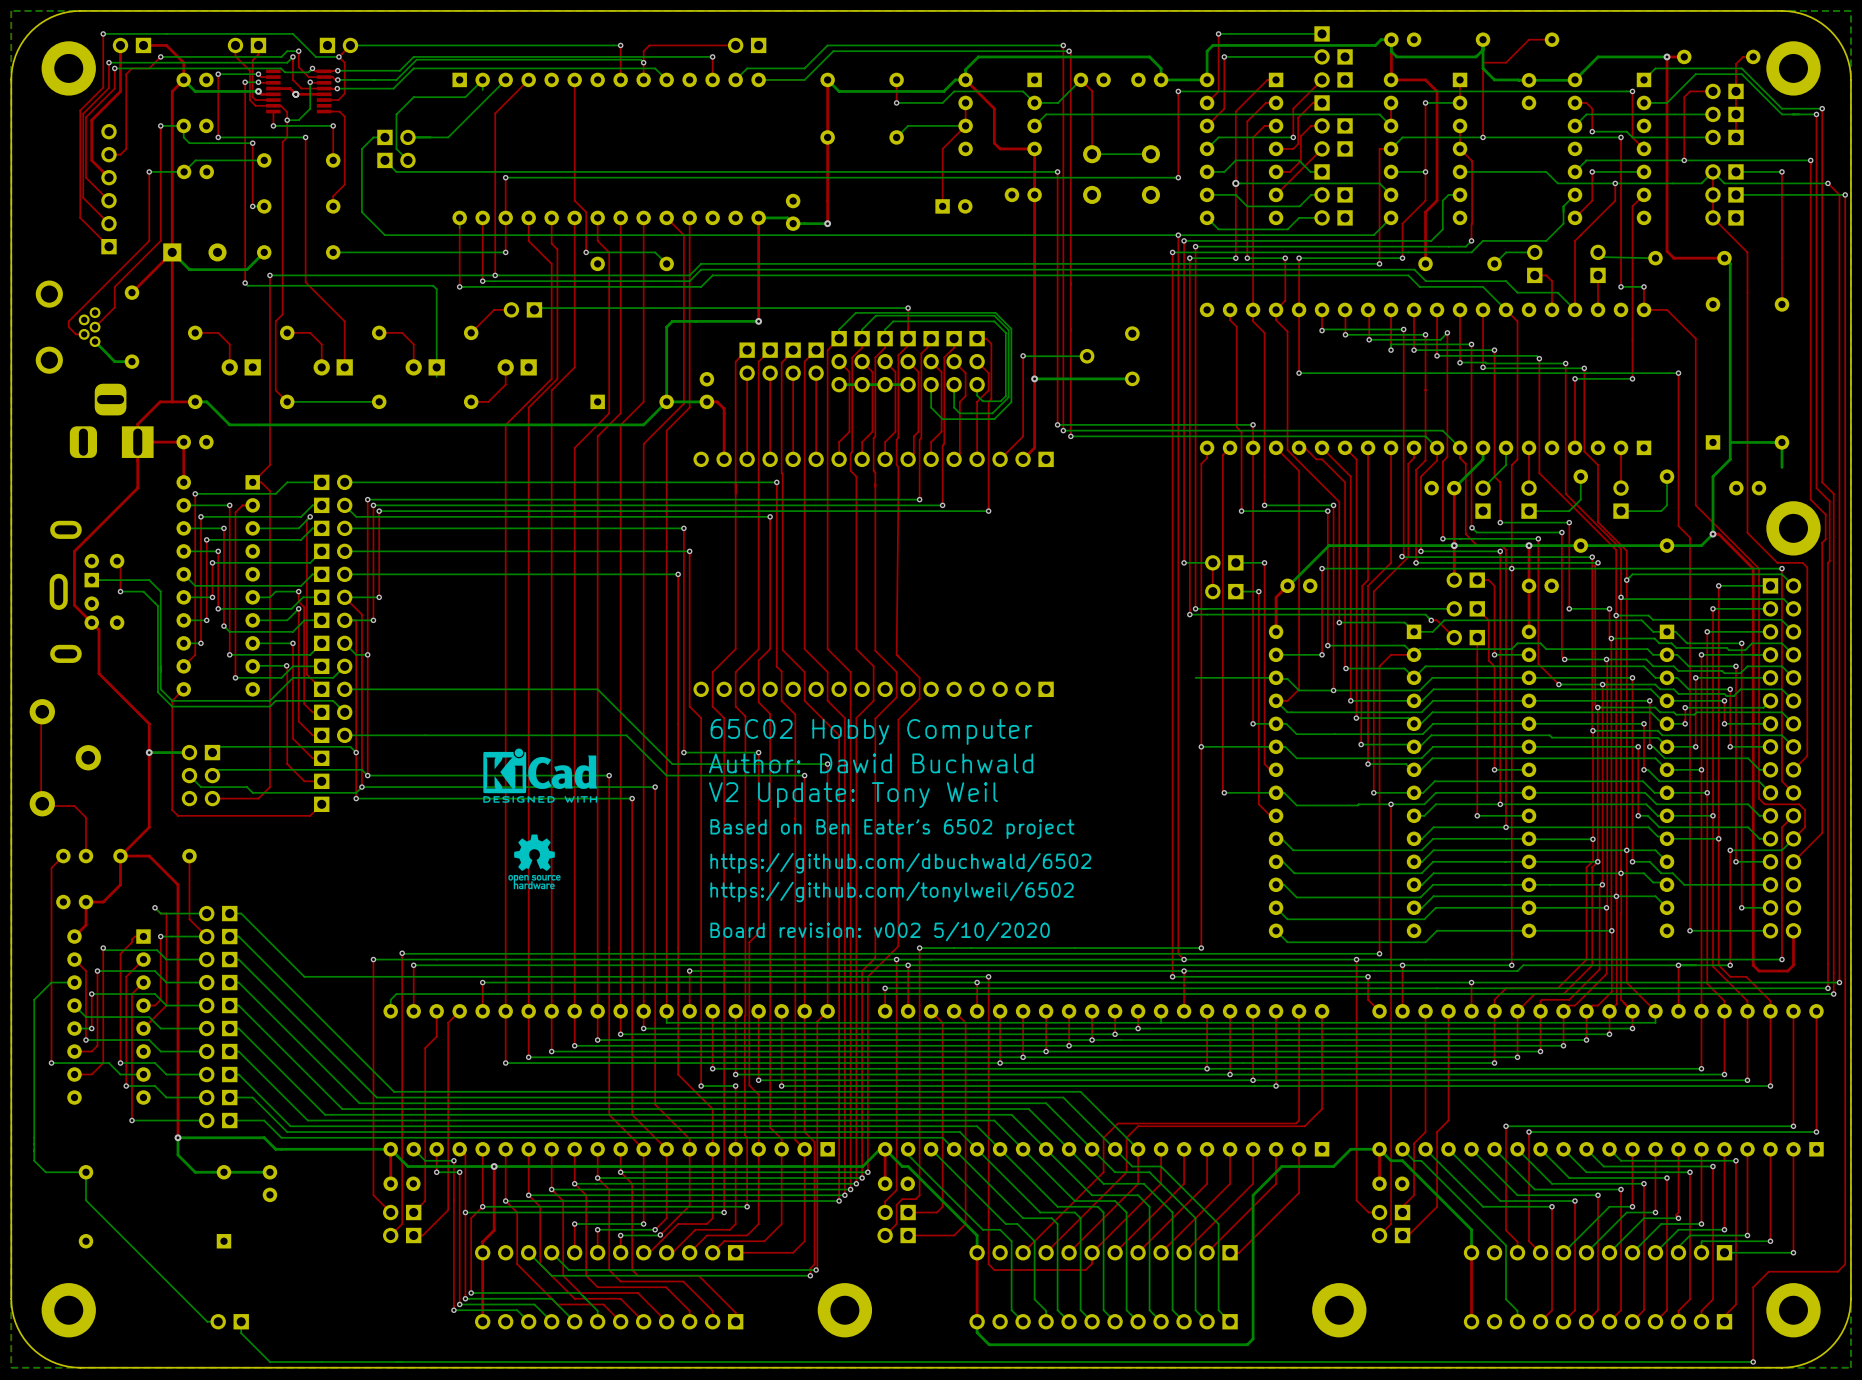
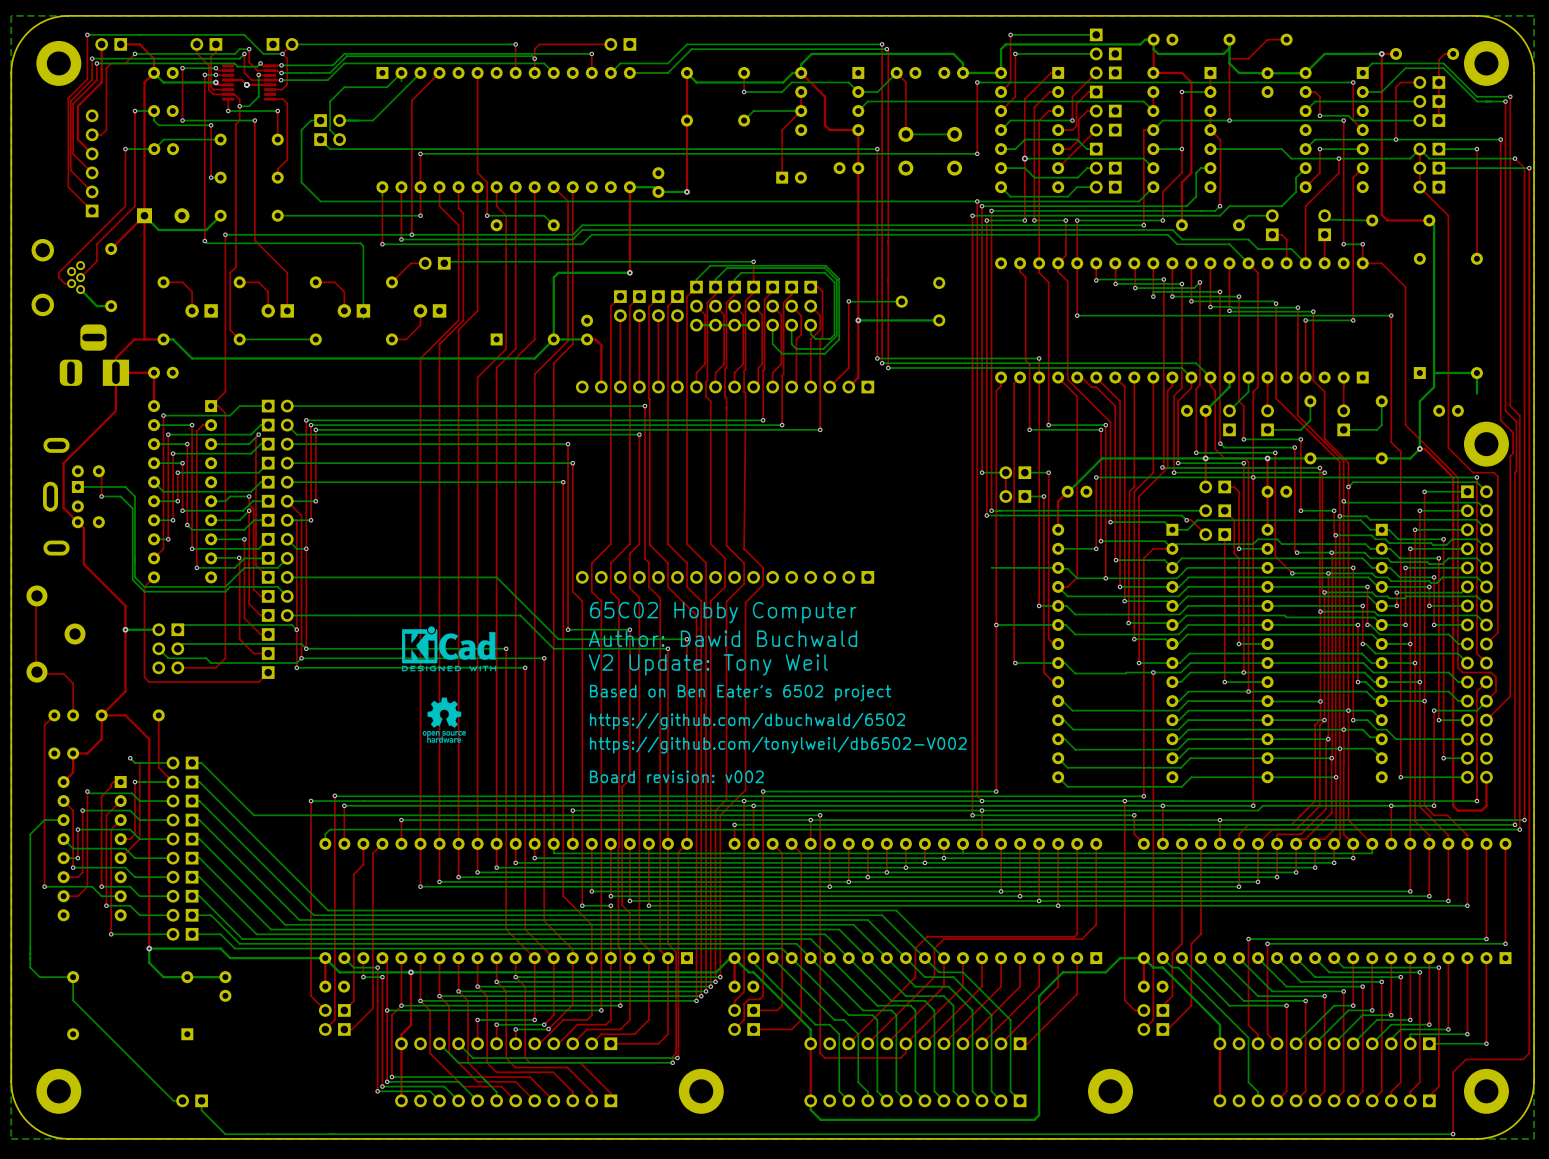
text: https://github.com/tonylweil/6502 (892, 891) -> https://github.com/tonylweil/db6502-V002 (778, 745)
text: Board revision: v002 5/10/2020 (880, 931) -> Board revision: v002 (676, 776)

